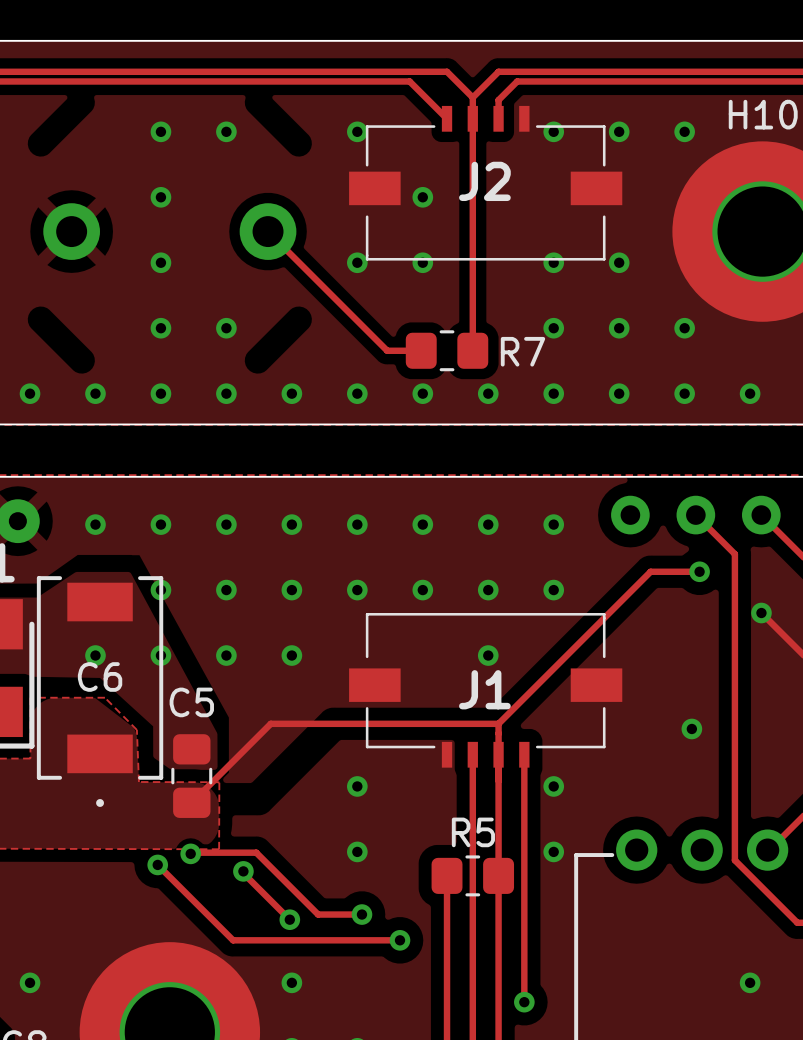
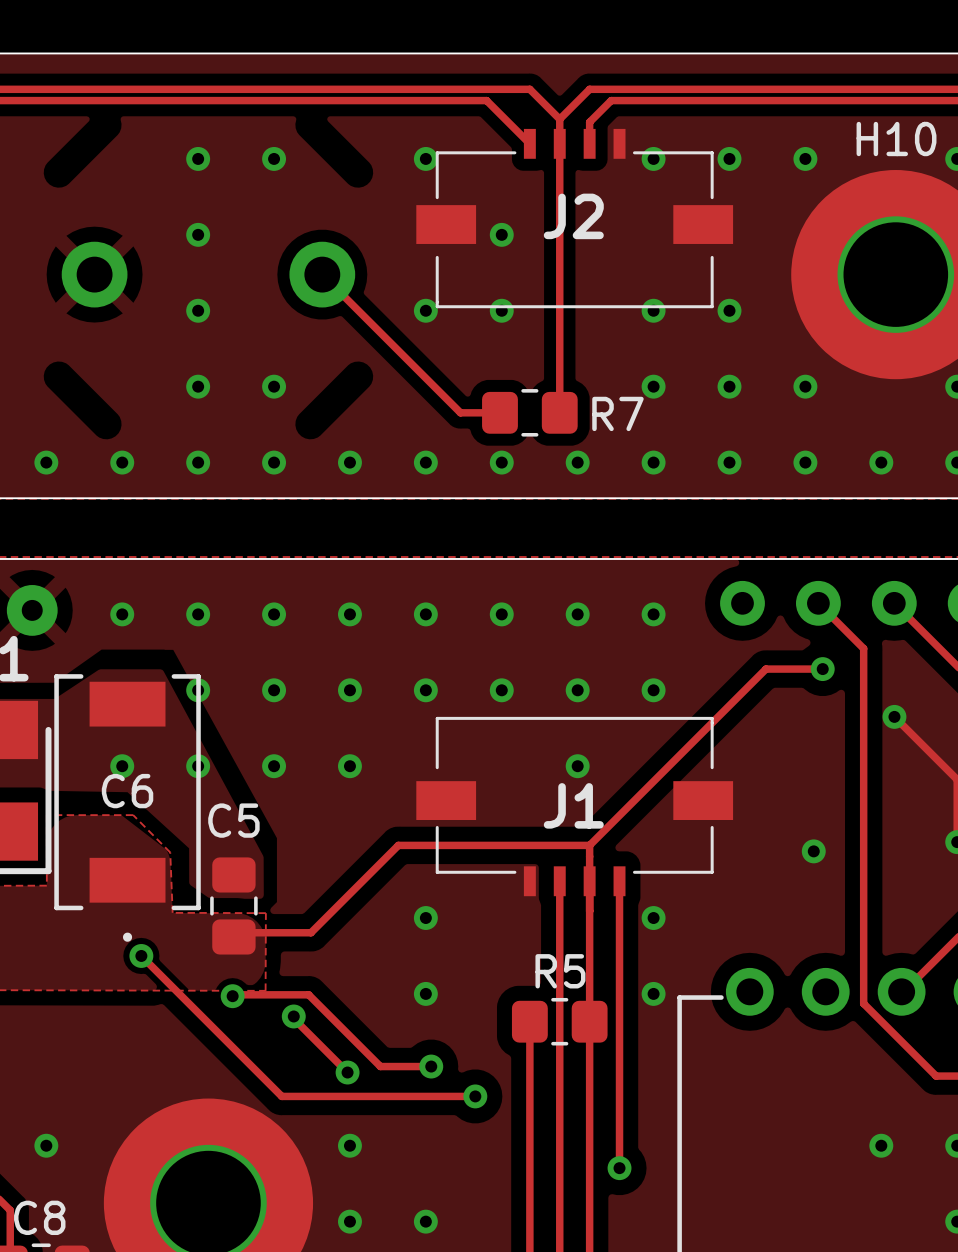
track: (333, 723) (270, 723) (191, 802) -> (398, 845) (311, 932) (238, 932)
track: none -> (141, 955) (194, 1009)
via position: (157, 864) -> (141, 955)

